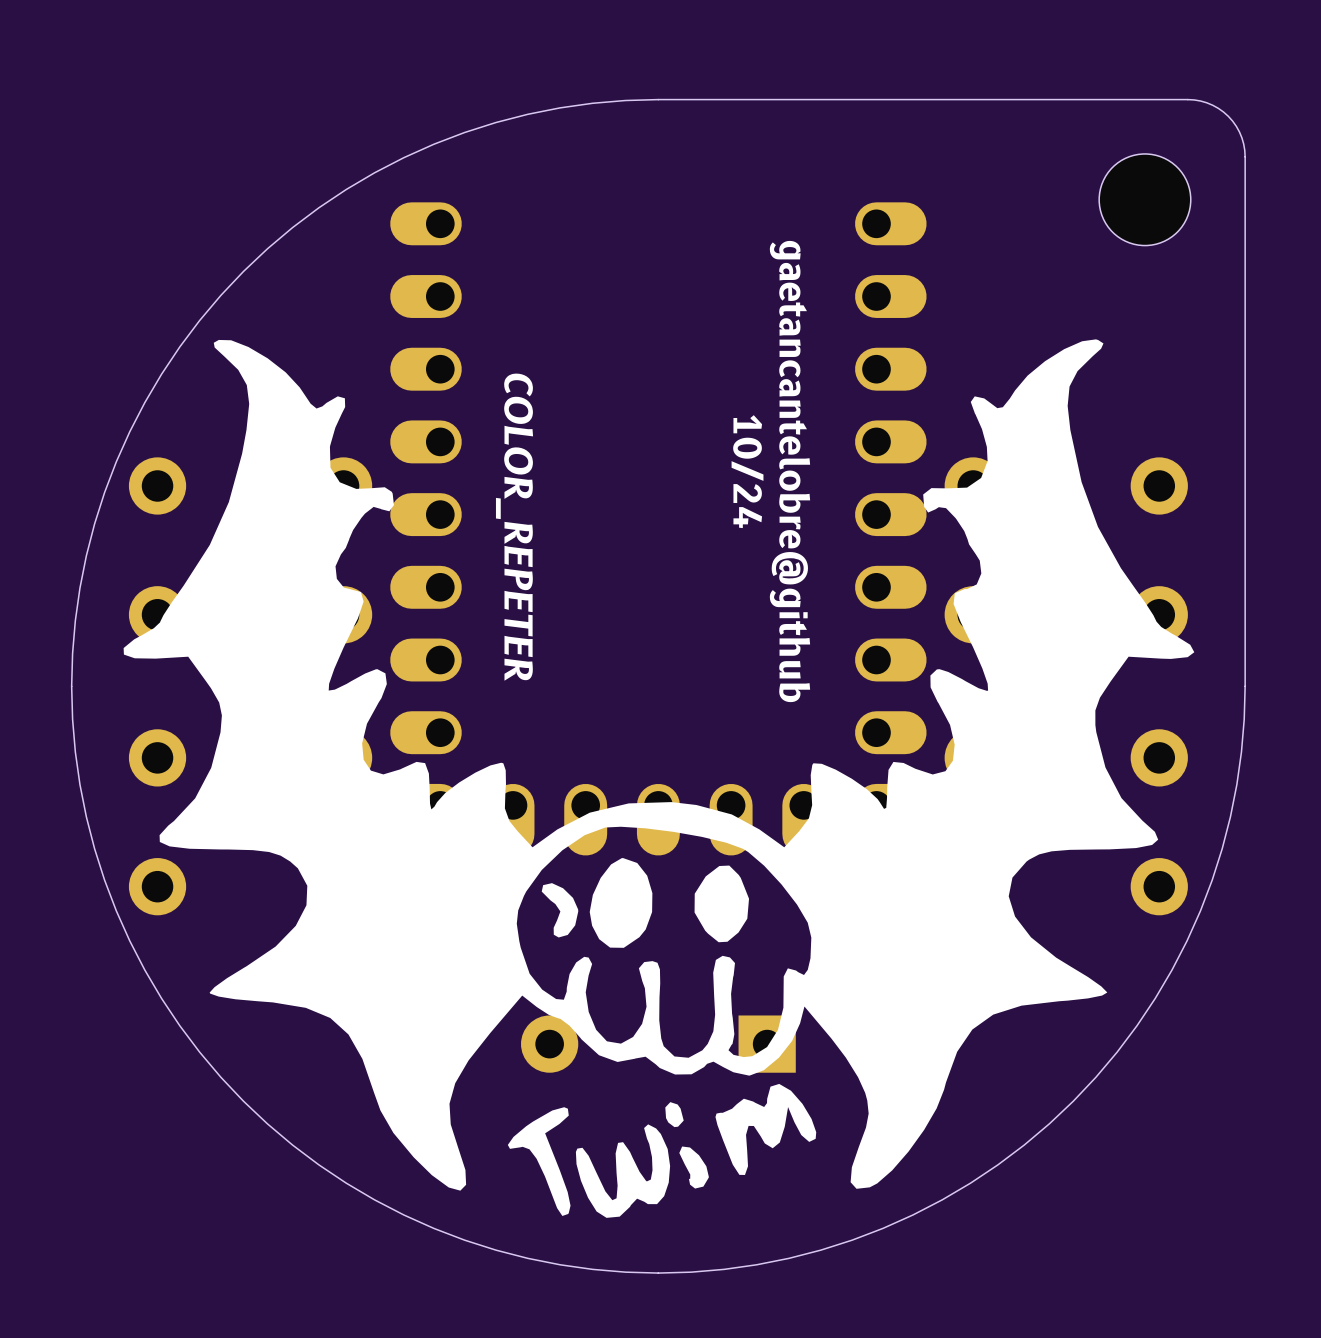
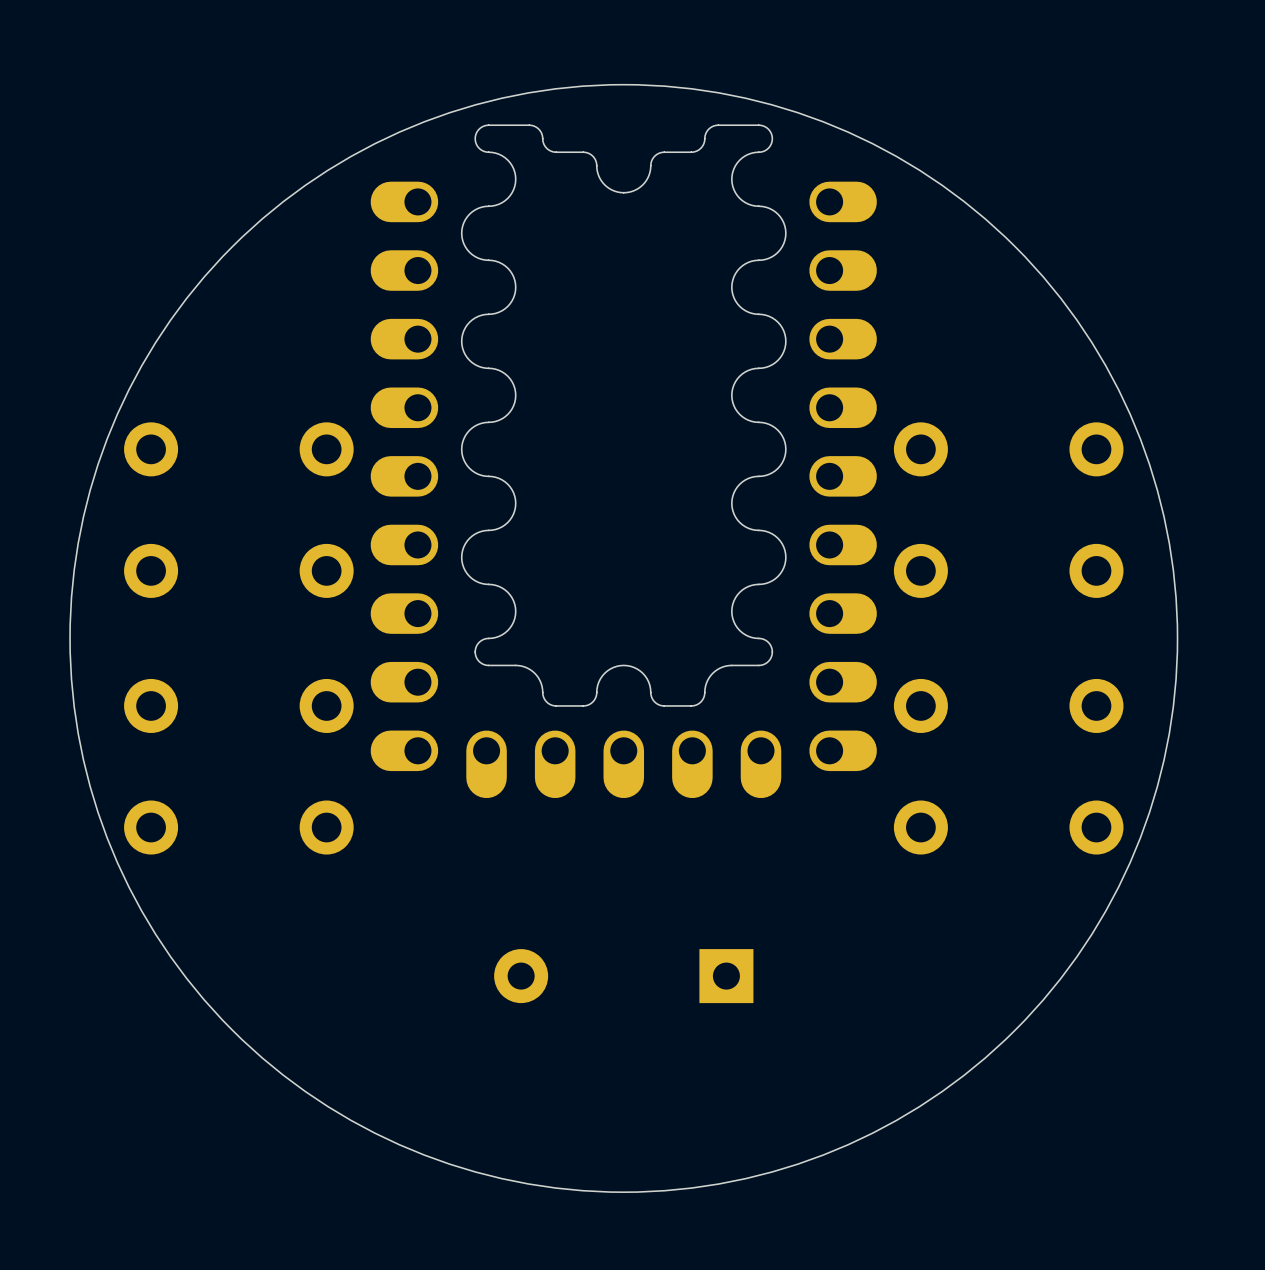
round board edge: none -> [69, 84, 1179, 1193]
board edge: (1187, 99) (658, 99) (592, 103) (527, 114) (464, 132) (403, 157) (374, 172) (318, 207) (292, 227) (243, 271) (220, 295) (199, 320) (161, 374) (129, 431) (104, 492) (86, 555) (75, 620) (71, 686) (72, 719) (79, 784) (94, 848) (104, 880) (129, 940) (161, 998) (179, 1025) (220, 1077) (267, 1123) (292, 1145) (346, 1183) (403, 1214) (464, 1240) (527, 1258) (592, 1269) (658, 1273) (691, 1272) (756, 1264) (820, 1250) (882, 1228) (912, 1214) (942, 1199) (997, 1164) (1049, 1123) (1095, 1077) (1136, 1025) (1155, 998) (1187, 940) (1200, 910) (1222, 848) (1230, 816) (1241, 752) (1245, 686) (1244, 150) (1239, 131) (1223, 112) (1206, 102) (1187, 99) -> none
board edge: none -> (758, 125) (718, 125) (711, 127) (706, 131) (703, 143) (698, 150) (662, 152) (656, 155) (651, 160) (649, 174) (644, 182) (635, 190) (623, 192) (612, 190) (602, 182) (598, 174) (595, 160) (591, 155) (585, 152) (549, 150) (543, 143) (540, 131) (534, 126) (486, 125) (480, 128) (476, 133) (475, 142) (480, 149) (499, 154) (510, 162) (514, 172) (515, 182) (512, 192) (505, 200) (495, 205) (478, 208) (469, 214) (462, 226) (462, 240) (467, 249) (475, 256) (499, 262) (507, 268) (514, 280) (515, 290) (512, 300) (505, 308) (495, 313) (478, 316) (469, 322) (462, 334) (461, 344) (465, 354) (472, 362) (481, 367) (499, 370) (507, 376) (513, 384) (515, 395) (512, 408) (505, 416) (495, 421) (478, 424) (469, 430) (462, 442) (461, 452) (465, 462) (472, 470) (481, 475) (499, 478) (507, 484) (513, 493) (515, 503) (512, 516) (505, 524) (495, 529) (478, 532) (469, 538) (462, 550) (461, 560) (469, 576) (478, 582) (495, 585) (505, 590) (512, 597) (515, 607) (514, 618) (507, 630) (499, 636) (483, 639) (478, 643) (475, 651) (477, 658) (485, 664) (518, 665) (530, 669) (538, 678) (543, 697) (551, 704) (583, 705) (590, 704) (595, 697) (597, 685) (602, 676) (613, 667) (623, 665) (634, 667) (645, 676) (649, 685) (651, 697) (657, 704) (664, 705) (694, 705) (703, 699) (707, 680) (717, 669) (728, 665) (762, 664) (771, 657) (772, 650) (769, 643) (764, 639) (751, 637) (742, 632) (735, 624) (731, 611) (733, 601) (739, 592) (748, 586) (765, 583) (775, 578) (782, 570) (785, 557) (783, 547) (777, 538) (769, 532) (751, 529) (742, 524) (735, 516) (731, 503) (733, 493) (739, 484) (748, 478) (765, 475) (775, 470) (782, 462) (785, 452) (784, 442) (777, 430) (769, 424) (751, 421) (742, 416) (735, 408) (732, 398) (732, 388) (739, 376) (748, 370) (765, 367) (775, 362) (782, 354) (785, 344) (784, 334) (777, 322) (769, 316) (751, 313) (742, 308) (735, 300) (732, 290) (732, 280) (739, 268) (748, 262) (765, 259) (775, 254) (782, 246) (785, 236) (784, 226) (777, 214) (769, 208) (745, 202) (737, 195) (732, 186) (732, 172) (739, 160) (748, 154) (765, 150) (771, 143) (772, 136) (769, 130) (758, 125)
part: (1144, 199) -> none
drawing: [123, 339, 1195, 1218] -> none
text: 10/24 (747, 471) -> none
text: gaetancantelobre@github (789, 471) -> none
text: COLOR_REPETER (514, 527) -> none

